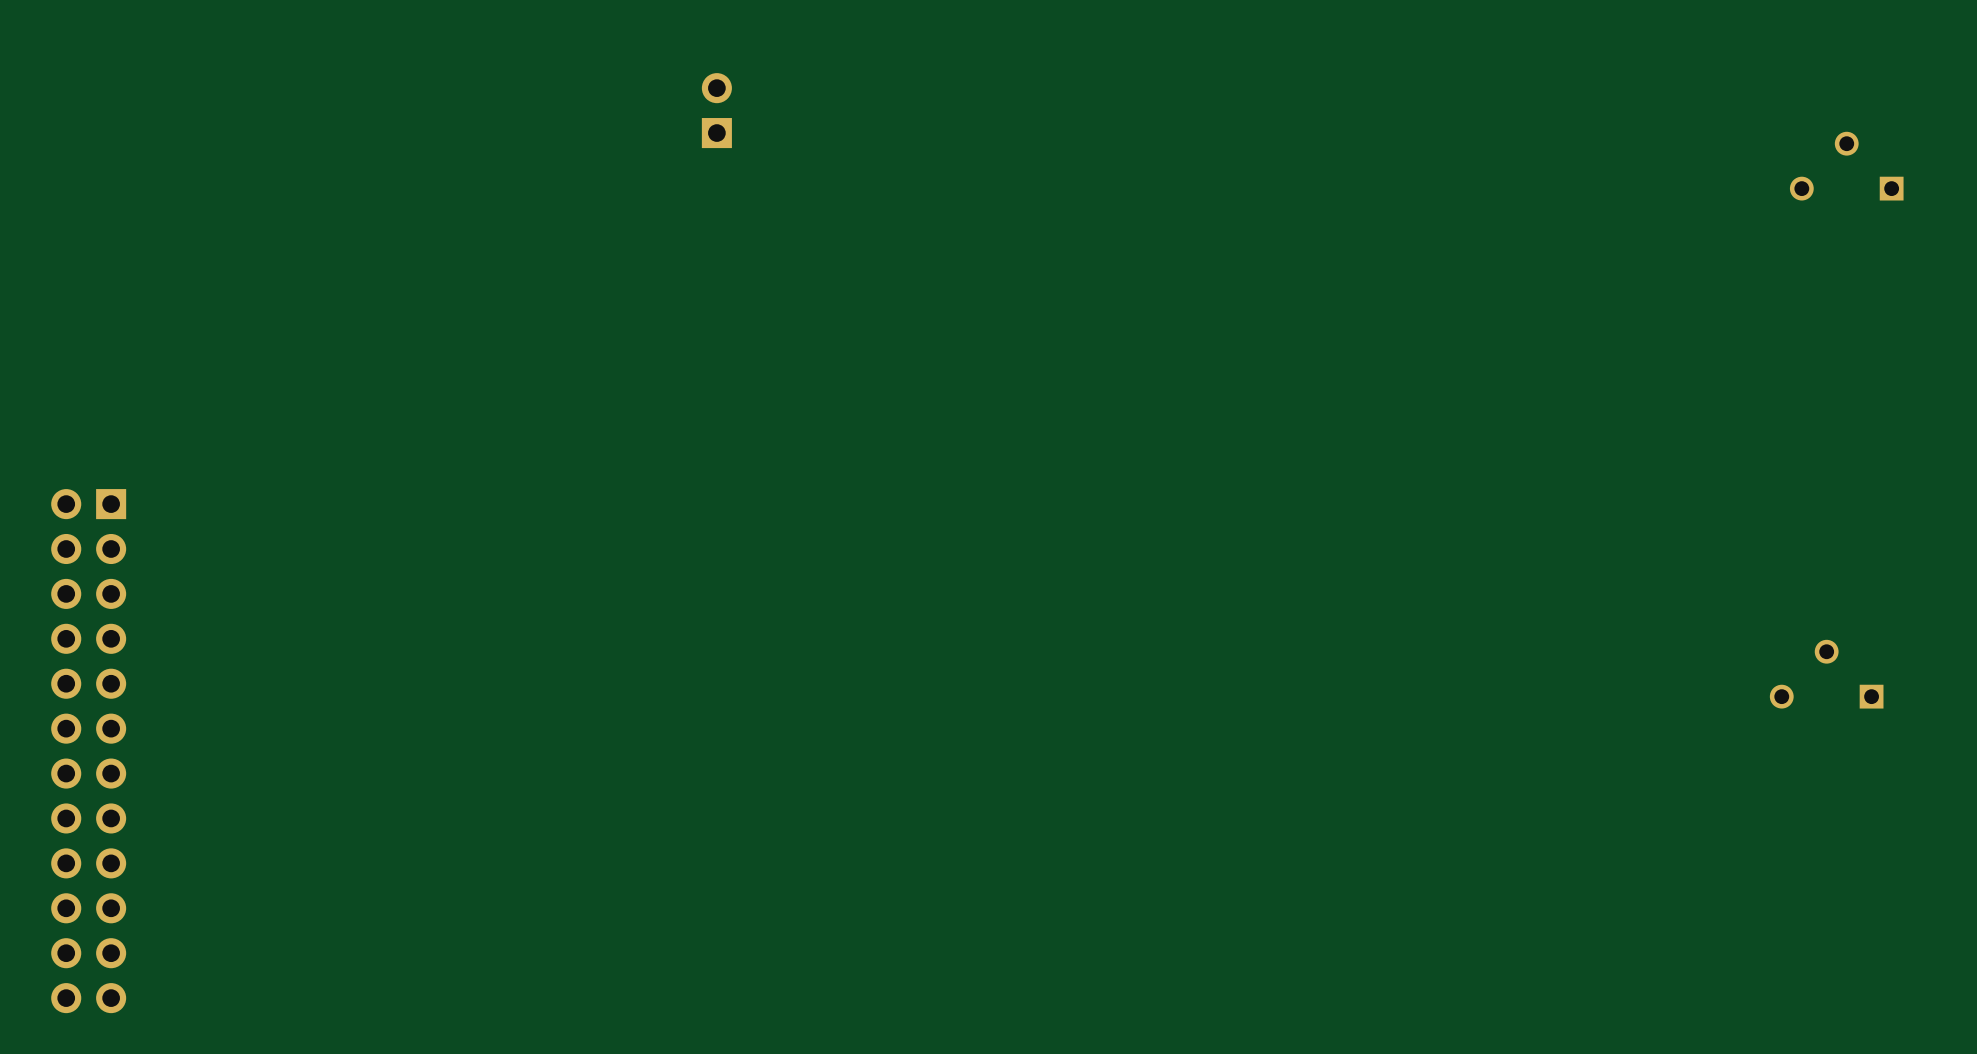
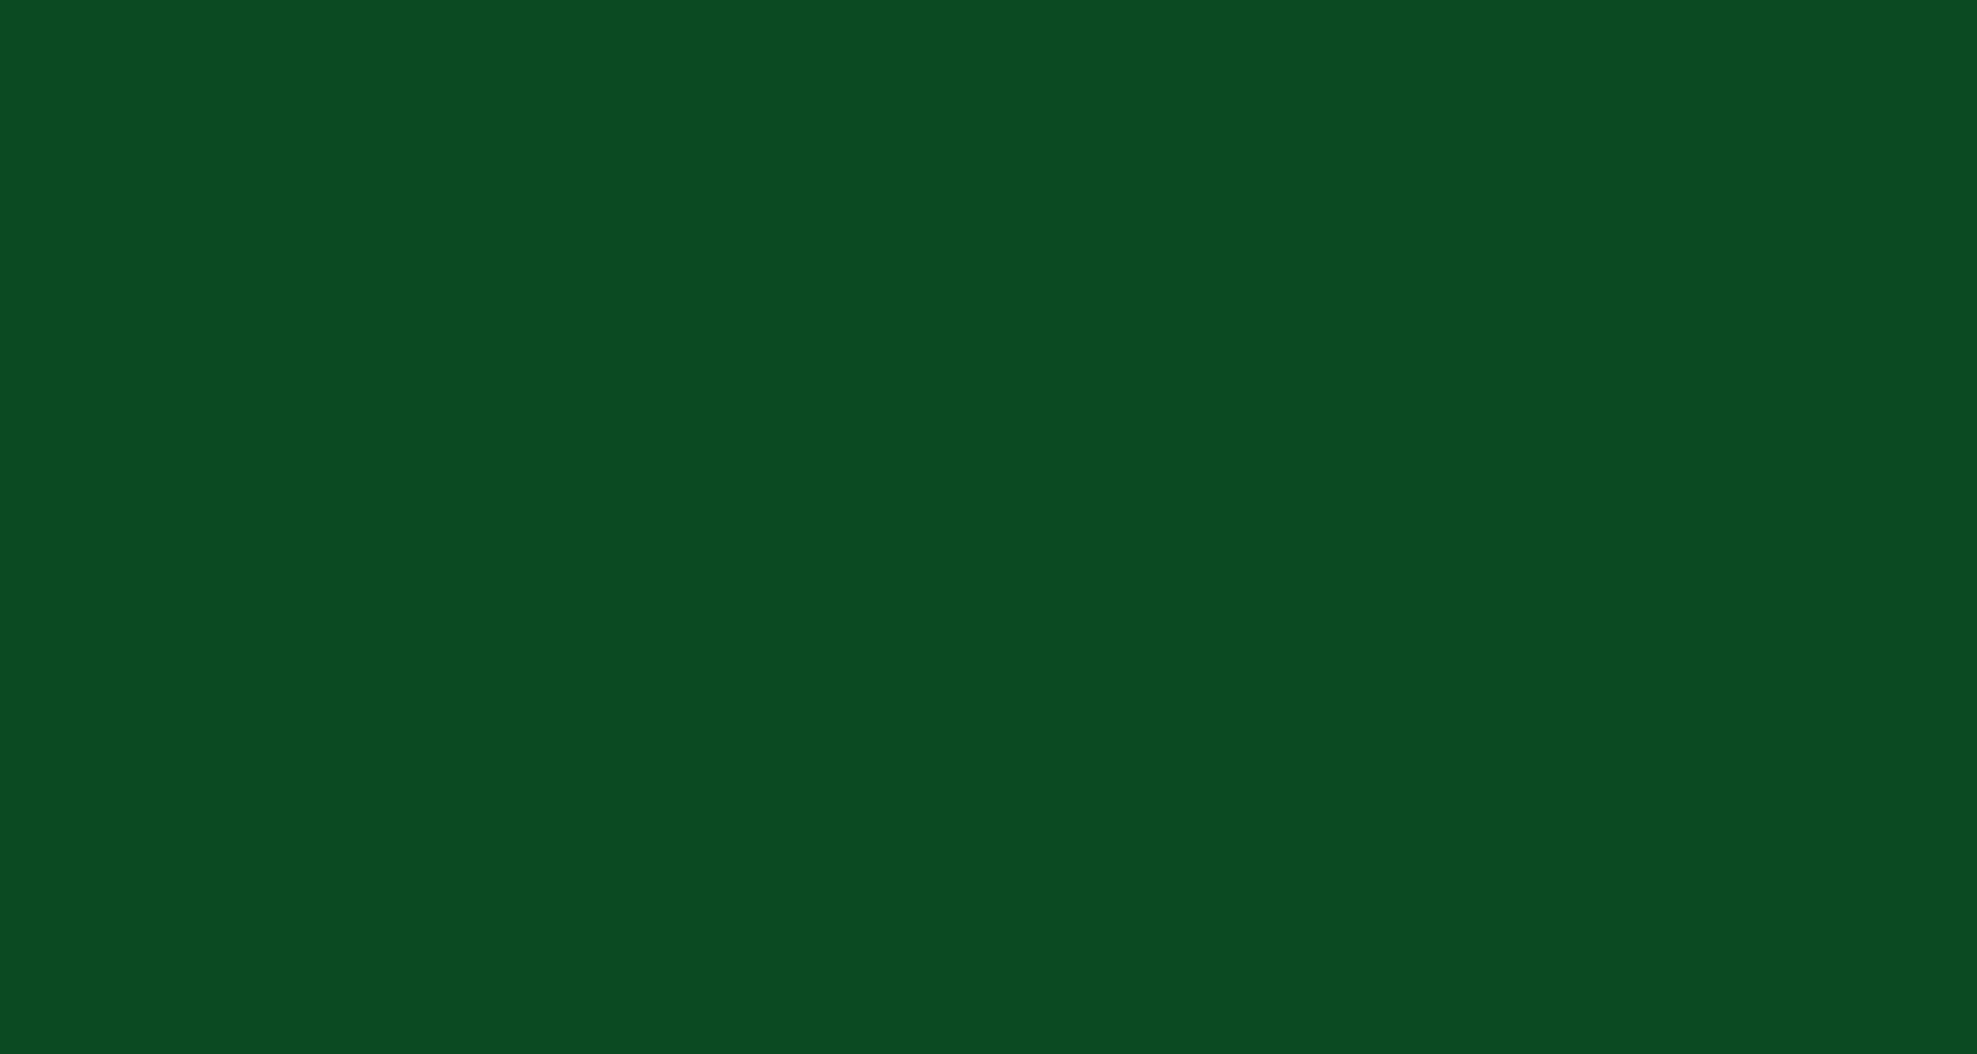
part: (716, 110) -> none
part: (1846, 166) -> none
part: (1826, 674) -> none
part: (88, 751) -> none

